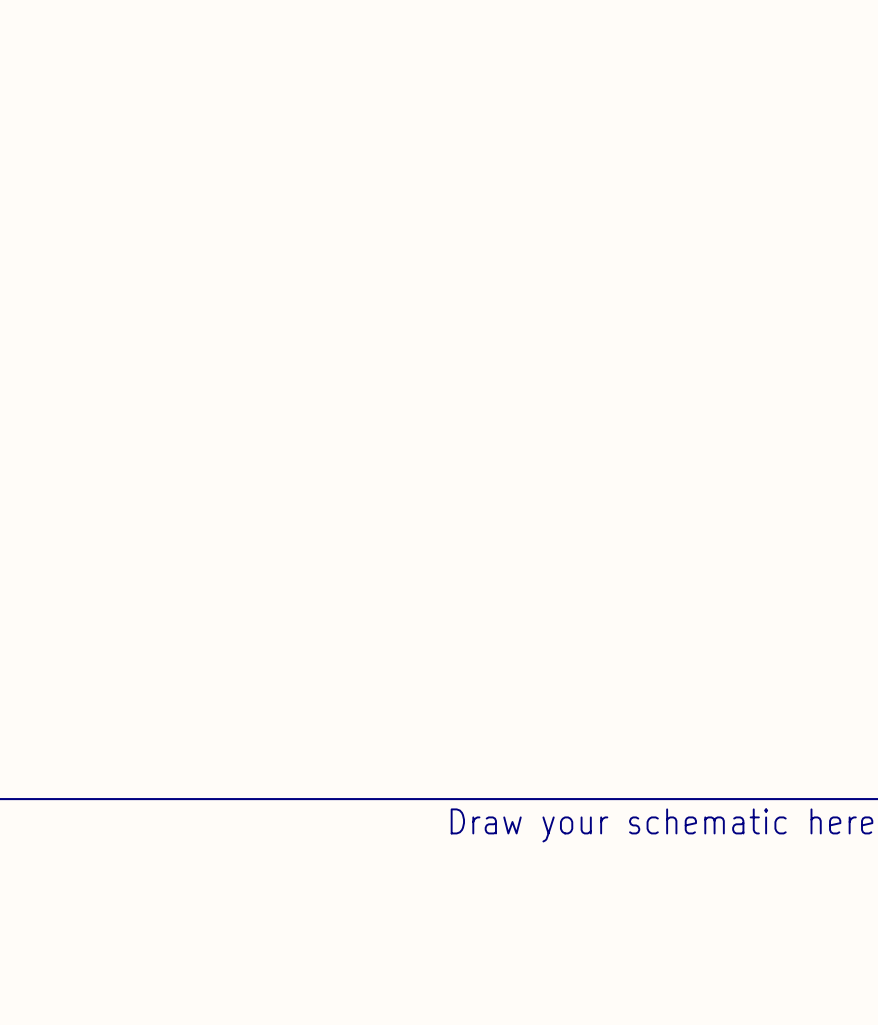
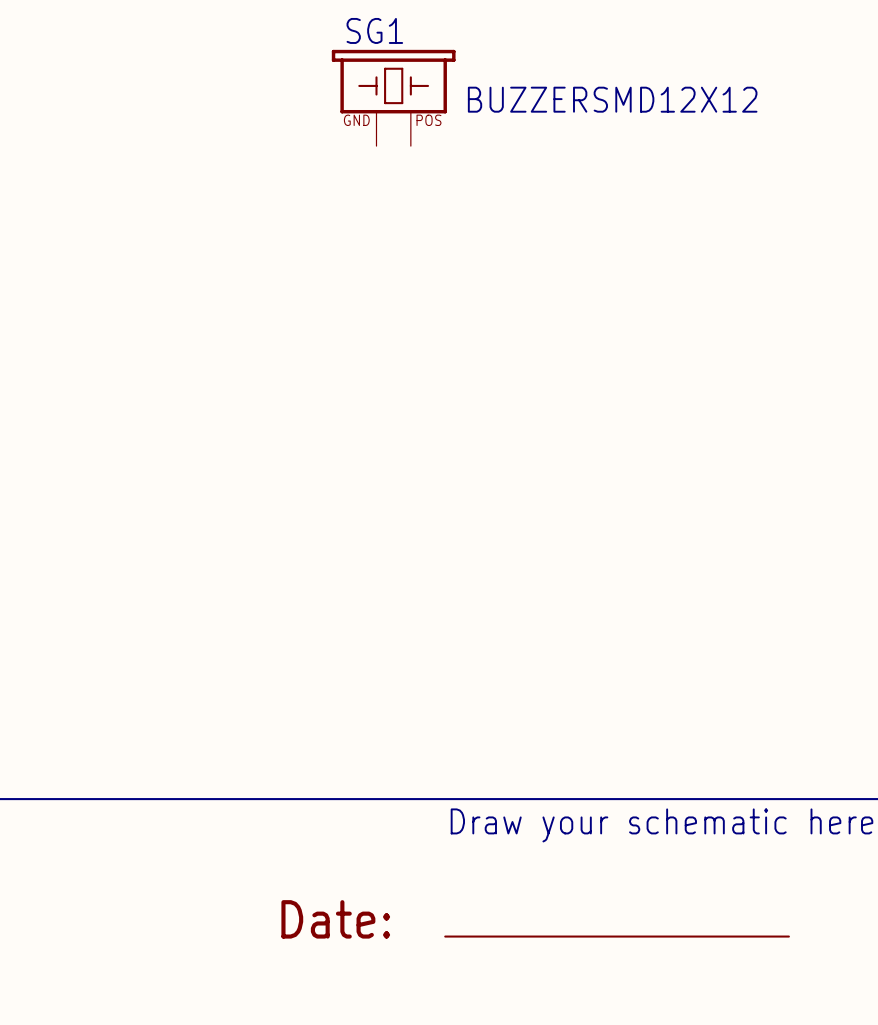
SG1: none -> BUZZERSMD12X12 (393, 97)
text: none -> Date: (335, 919)
line: none -> (445, 936) (788, 936)

